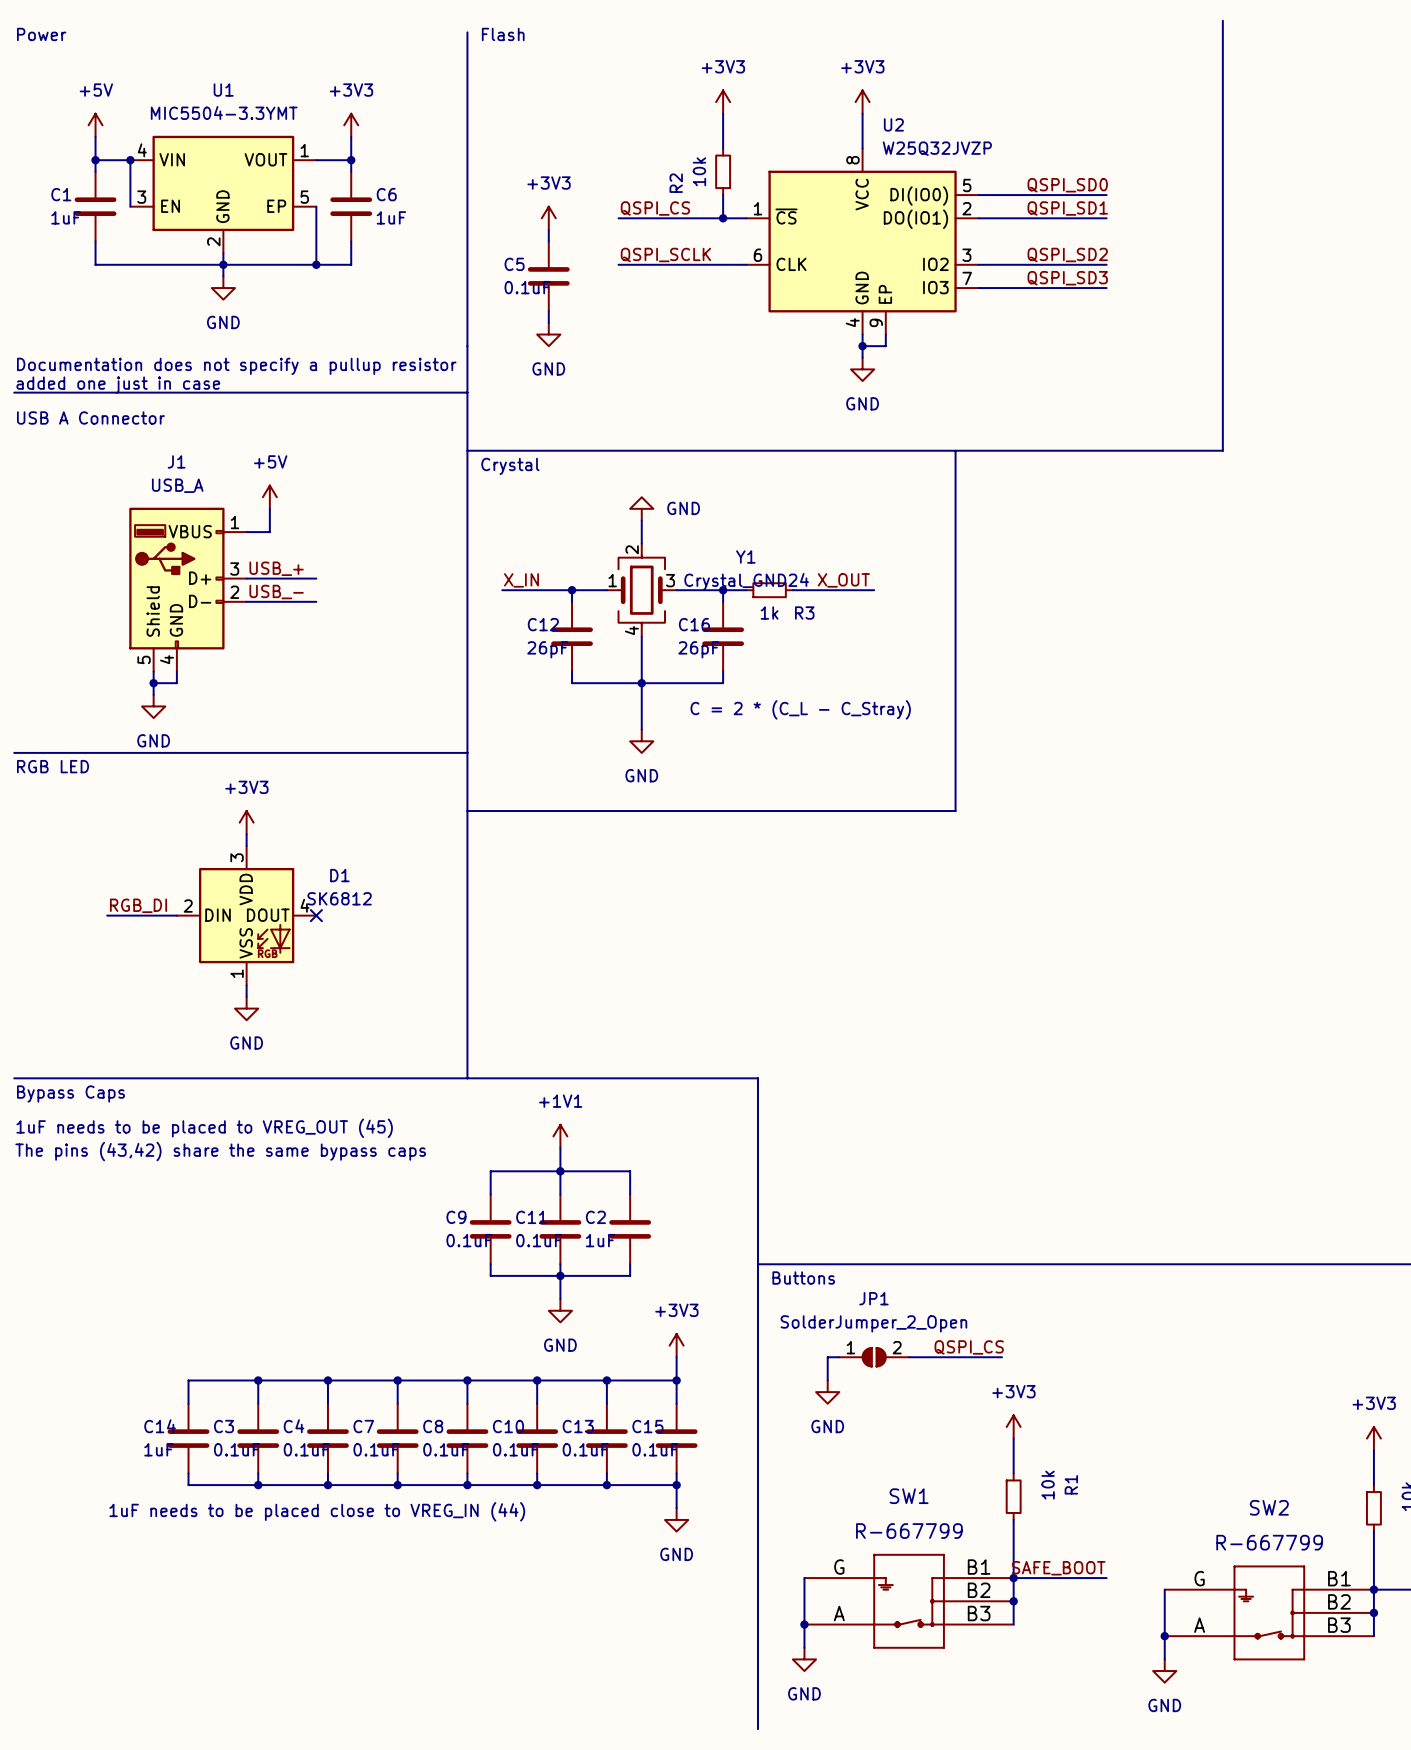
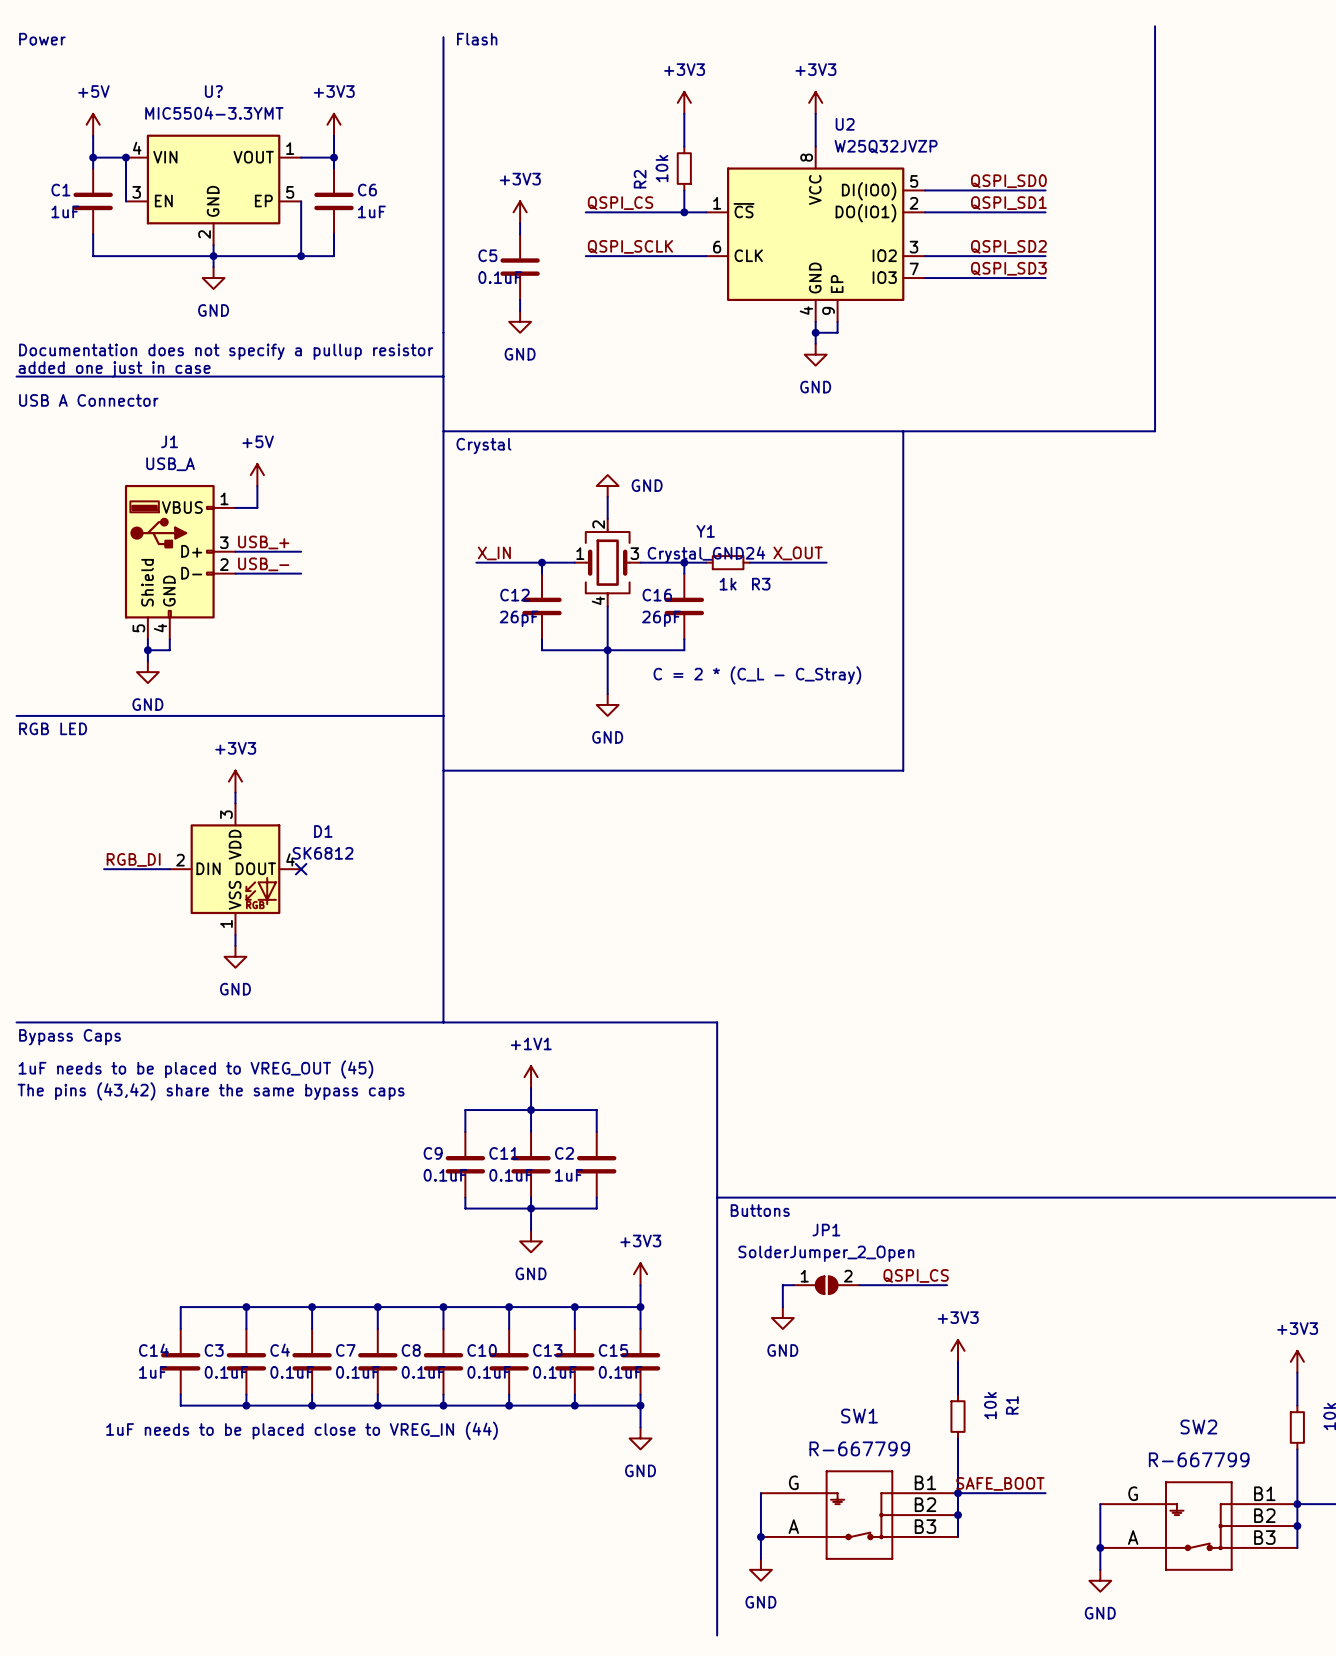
U1 name: U1 (223, 90) -> U? (213, 91)

